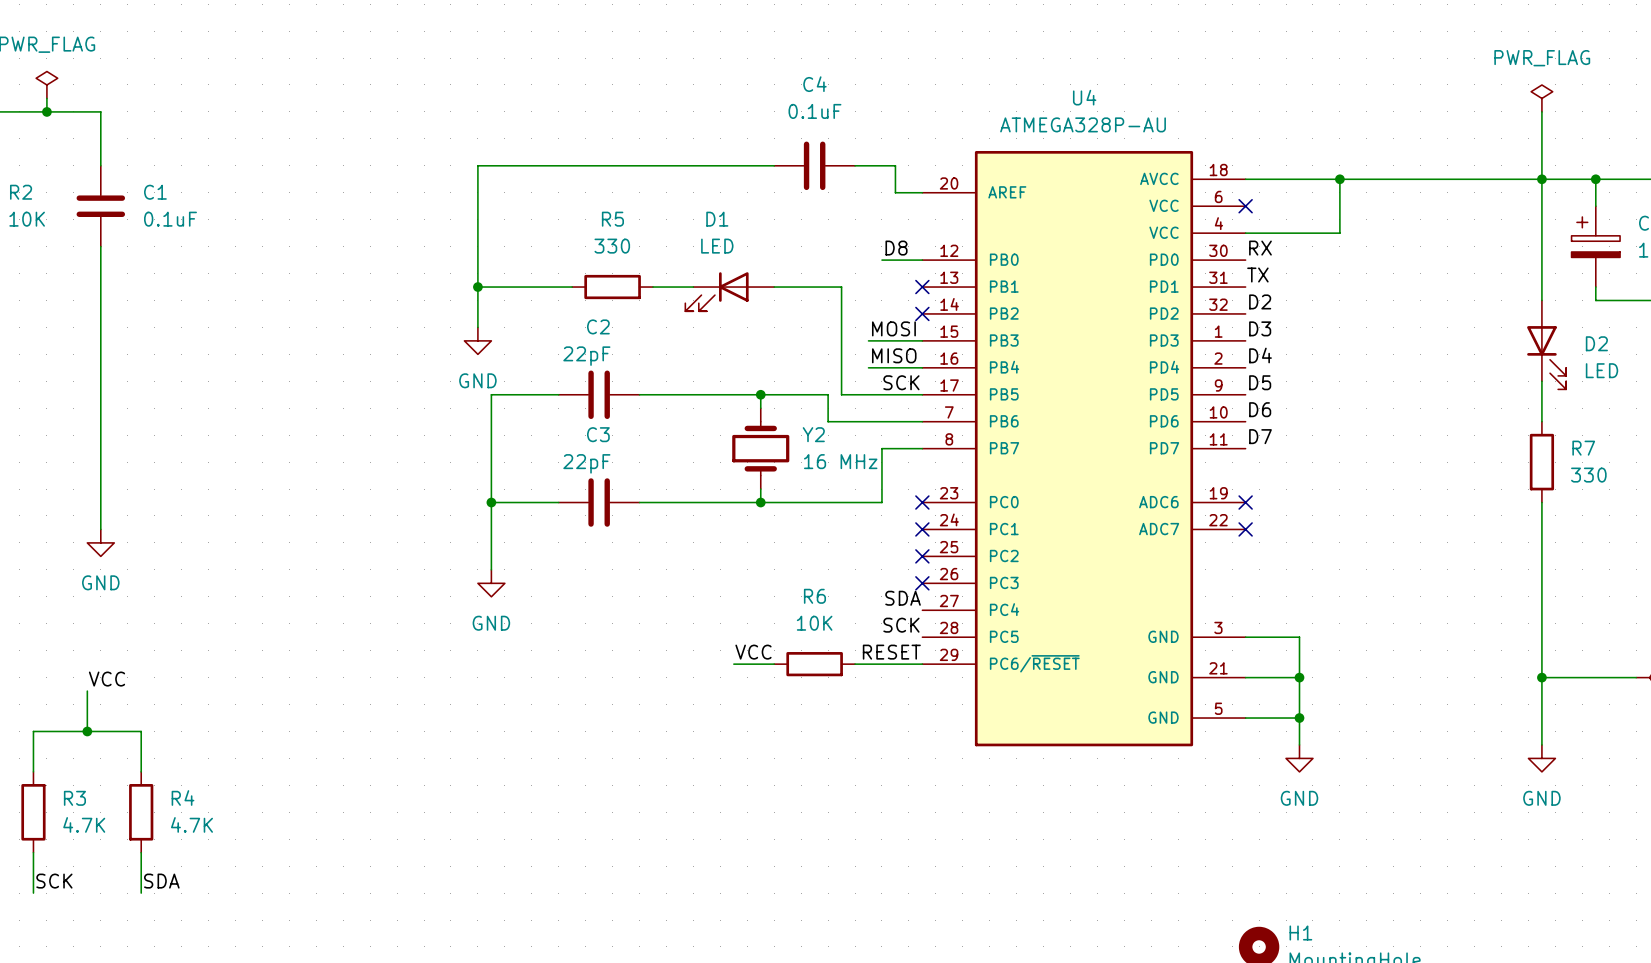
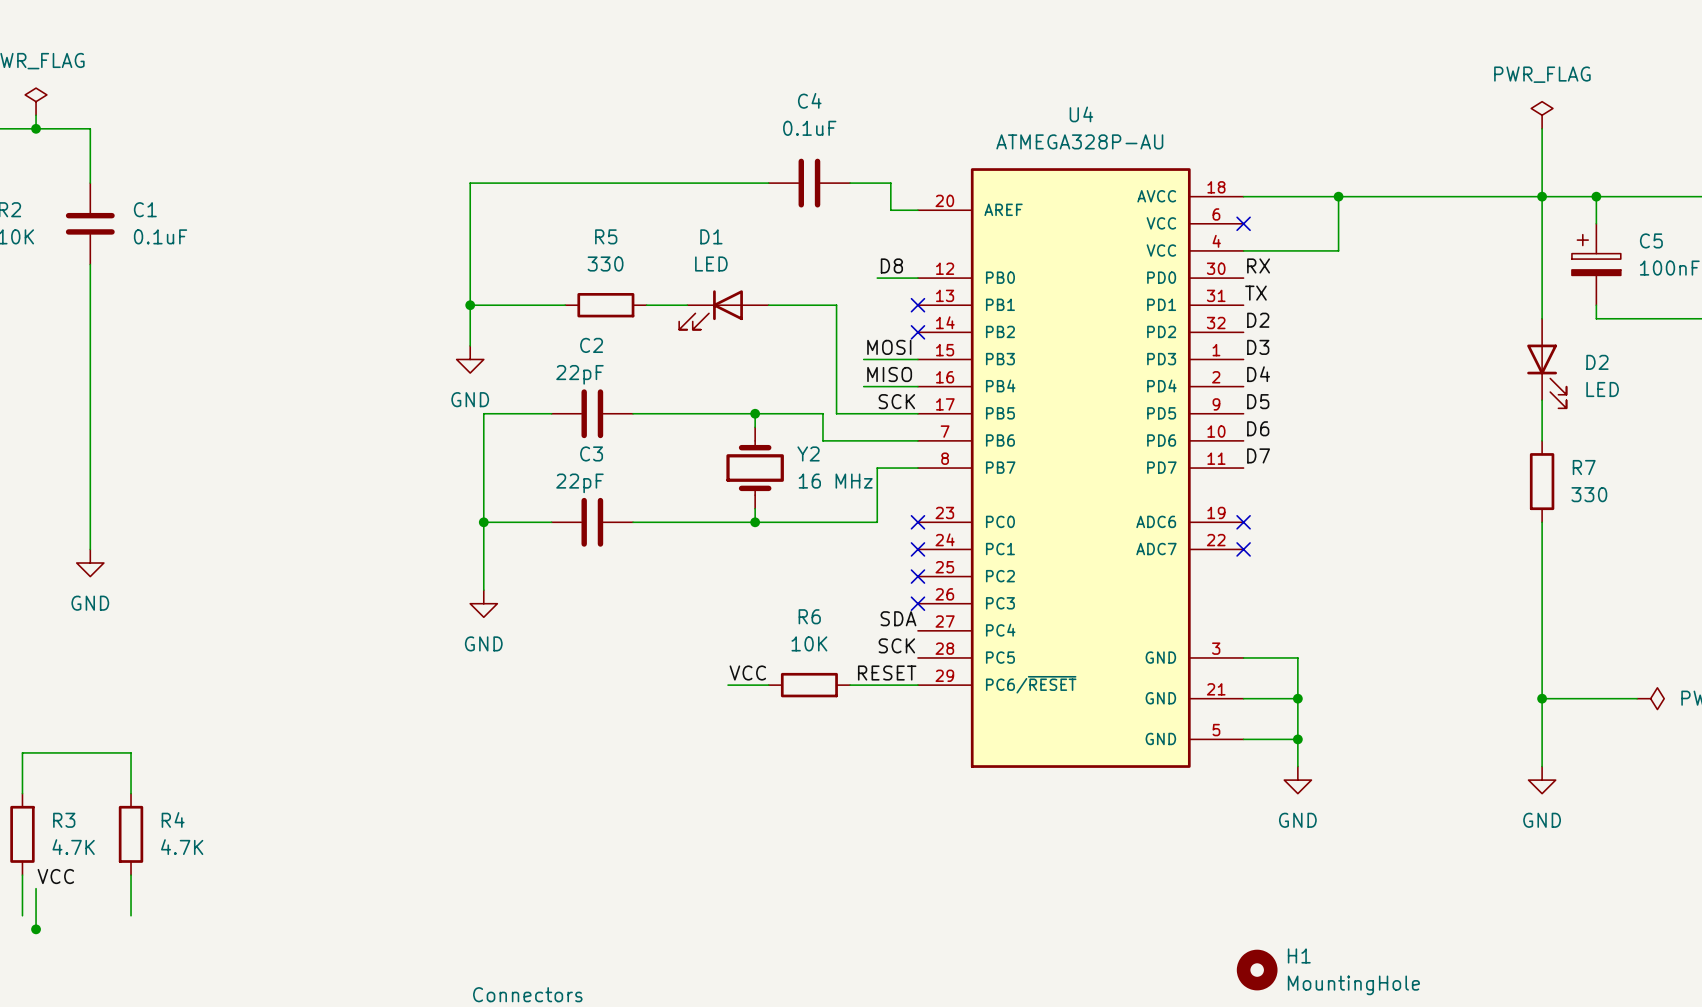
label: VCC (107, 679) -> none
wire: (87, 691) (87, 731) -> (36, 888) (36, 929)
junction: (87, 731) -> none
label: none -> VCC (55, 876)
label: SCK (54, 881) -> none
label: SDA (161, 881) -> none
junction: none -> (36, 929)

